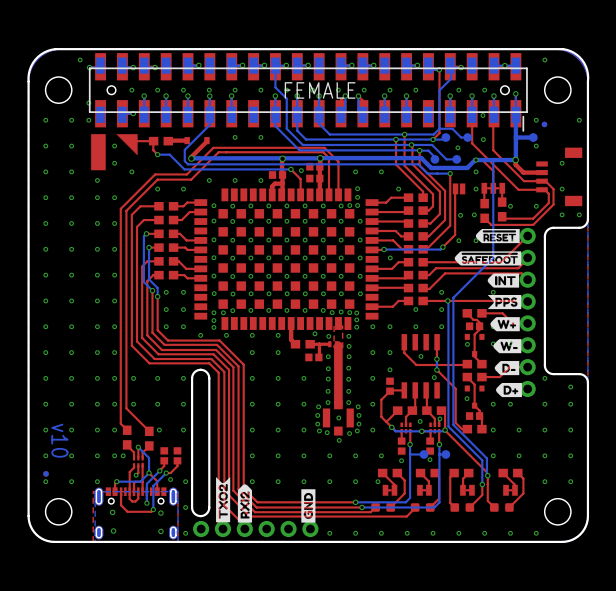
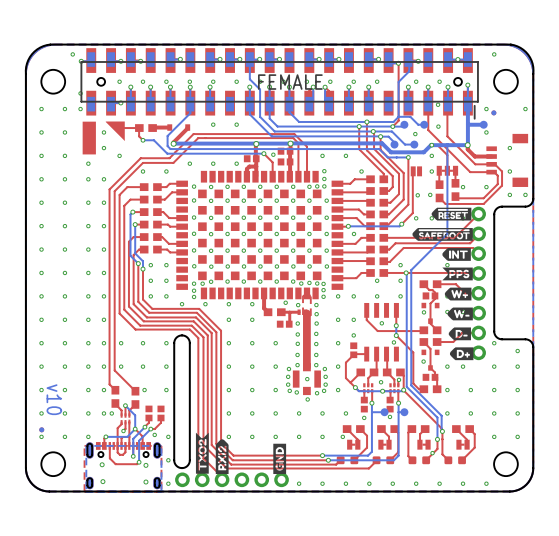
via: none -> (432, 453)

